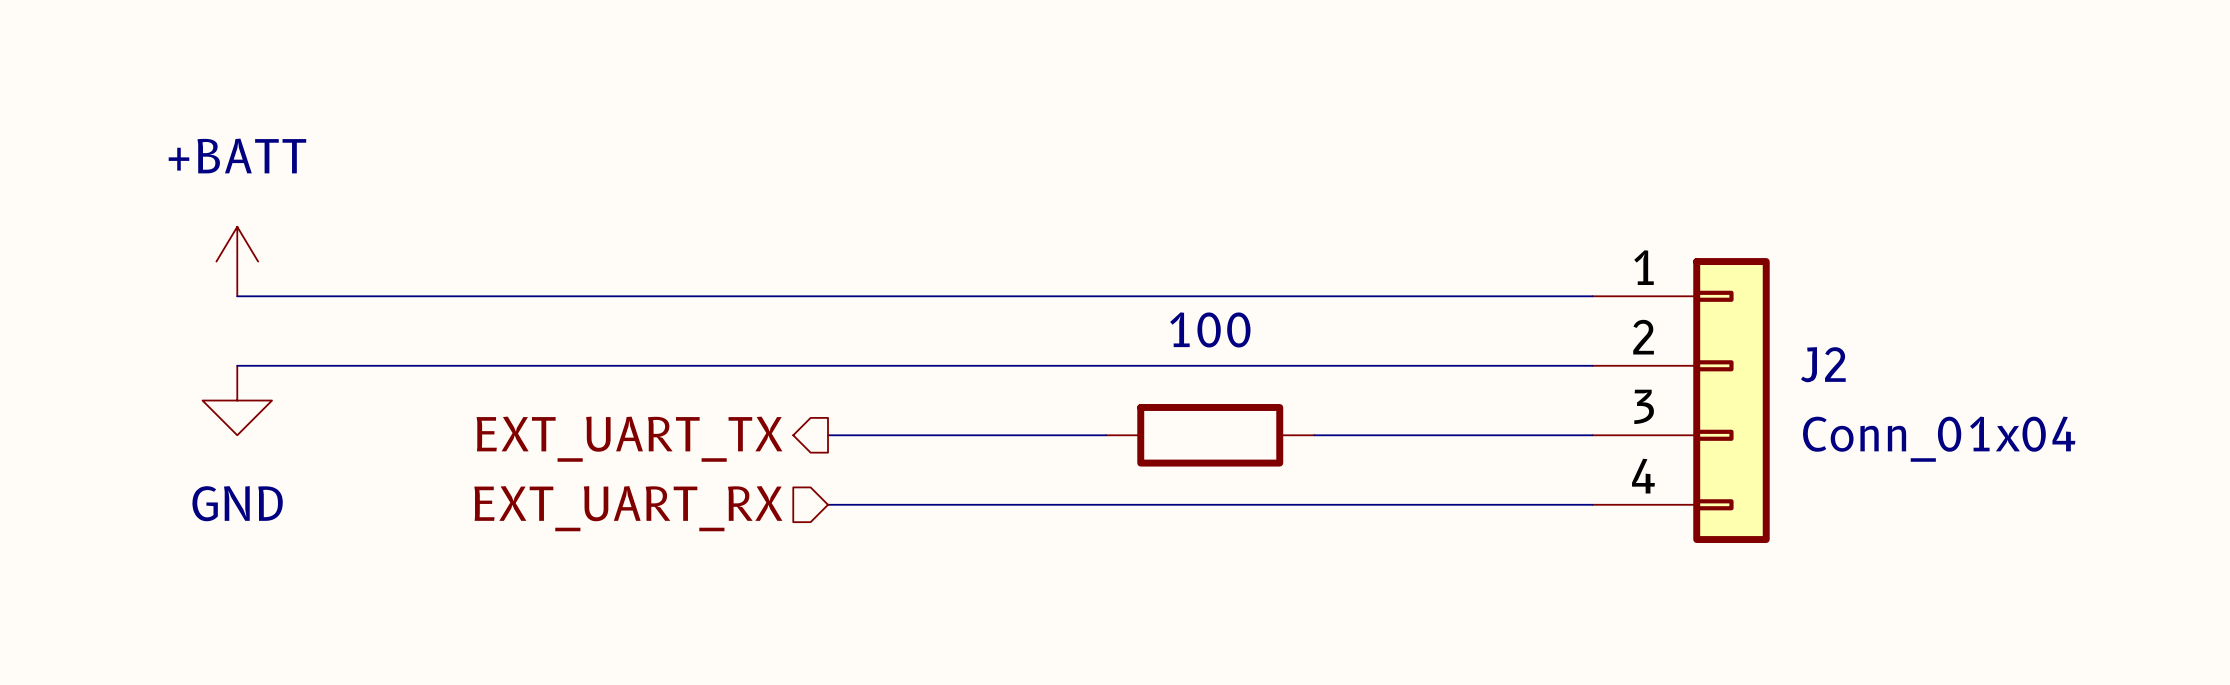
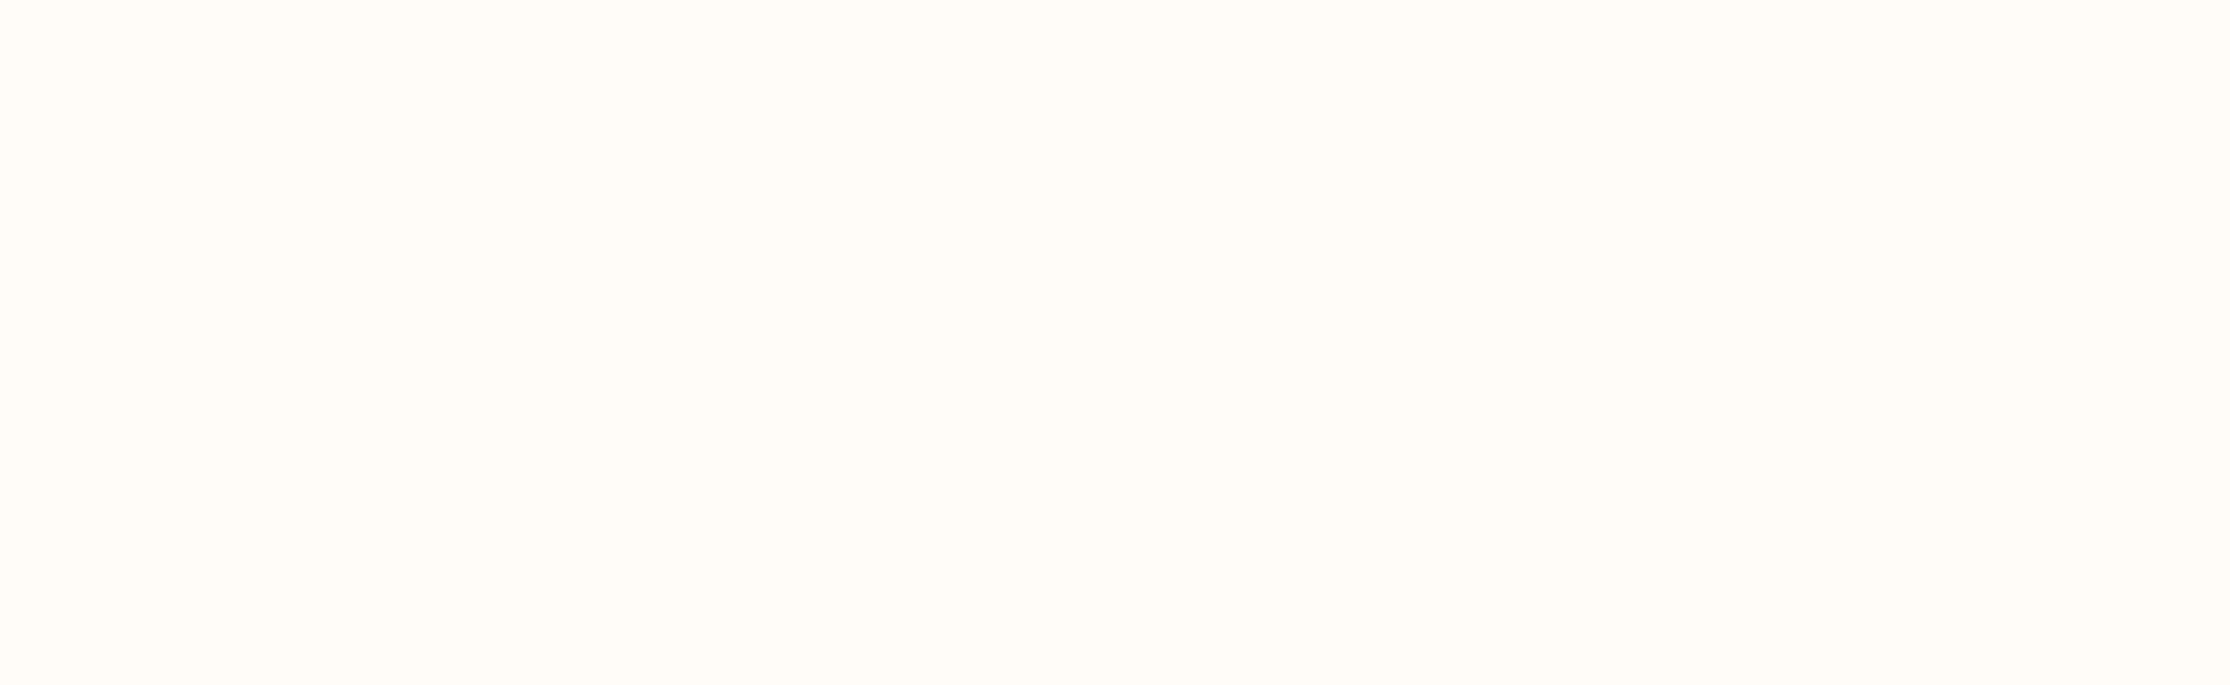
power symbol: +BATT (237, 261) -> none
wire: (237, 296) (1592, 296) -> none
wire: (237, 365) (1592, 365) -> none
power symbol: GND (237, 400) -> none
J2: Conn_01x04 (1681, 400) -> none
wire: (828, 435) (1106, 435) -> none
part: 100 (1210, 435) -> none
wire: (1314, 435) (1592, 435) -> none
hierarchical label: EXT_UART_TX (629, 439) -> none
wire: (828, 504) (1592, 504) -> none
hierarchical label: EXT_UART_RX (628, 508) -> none

